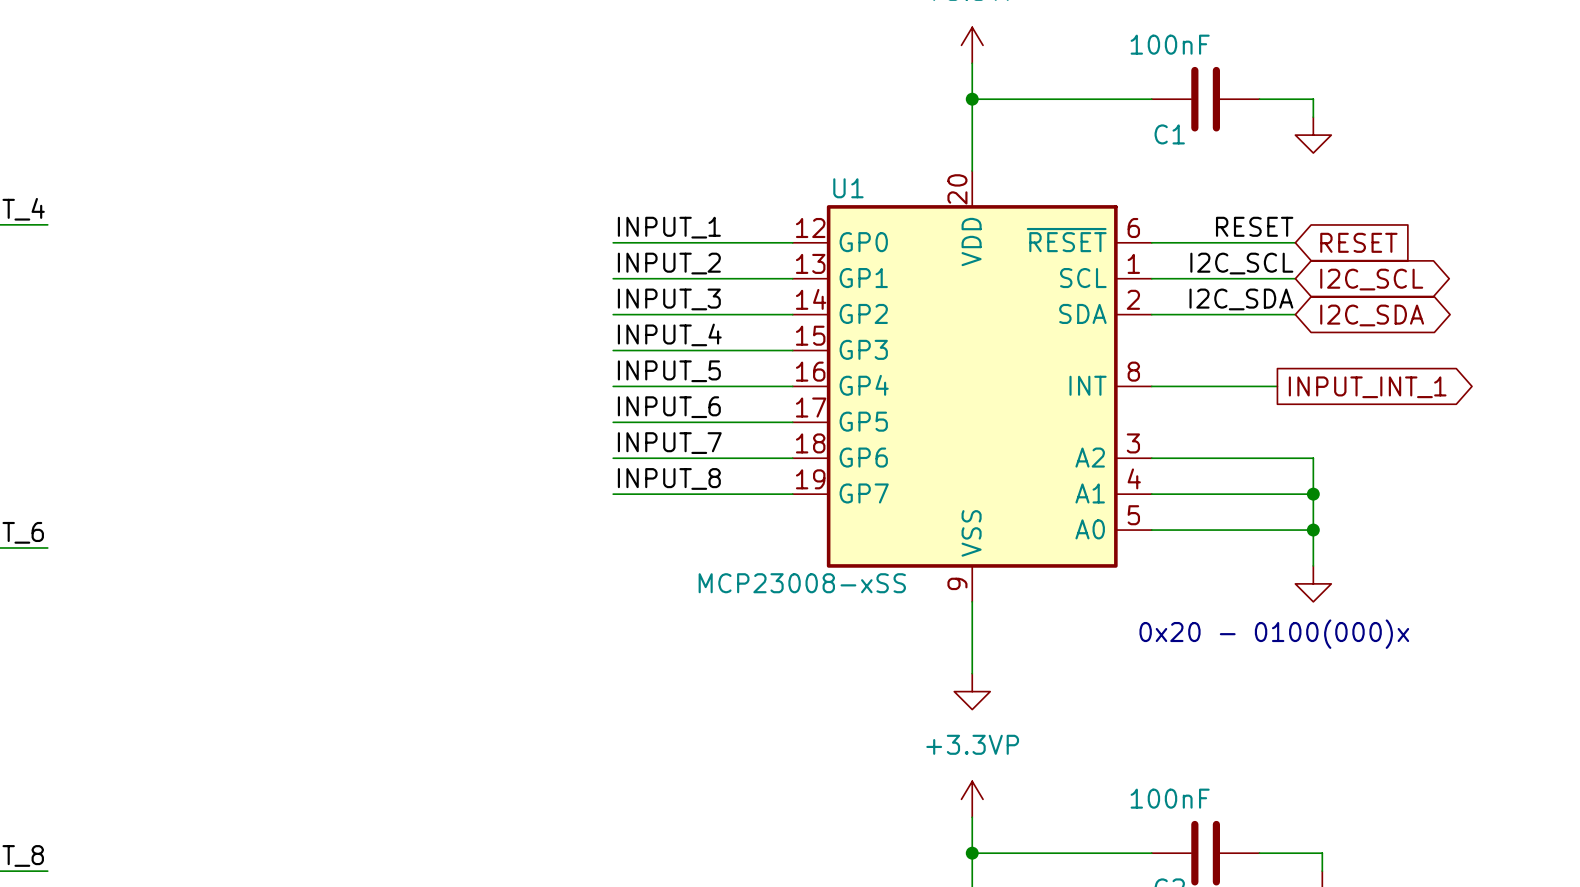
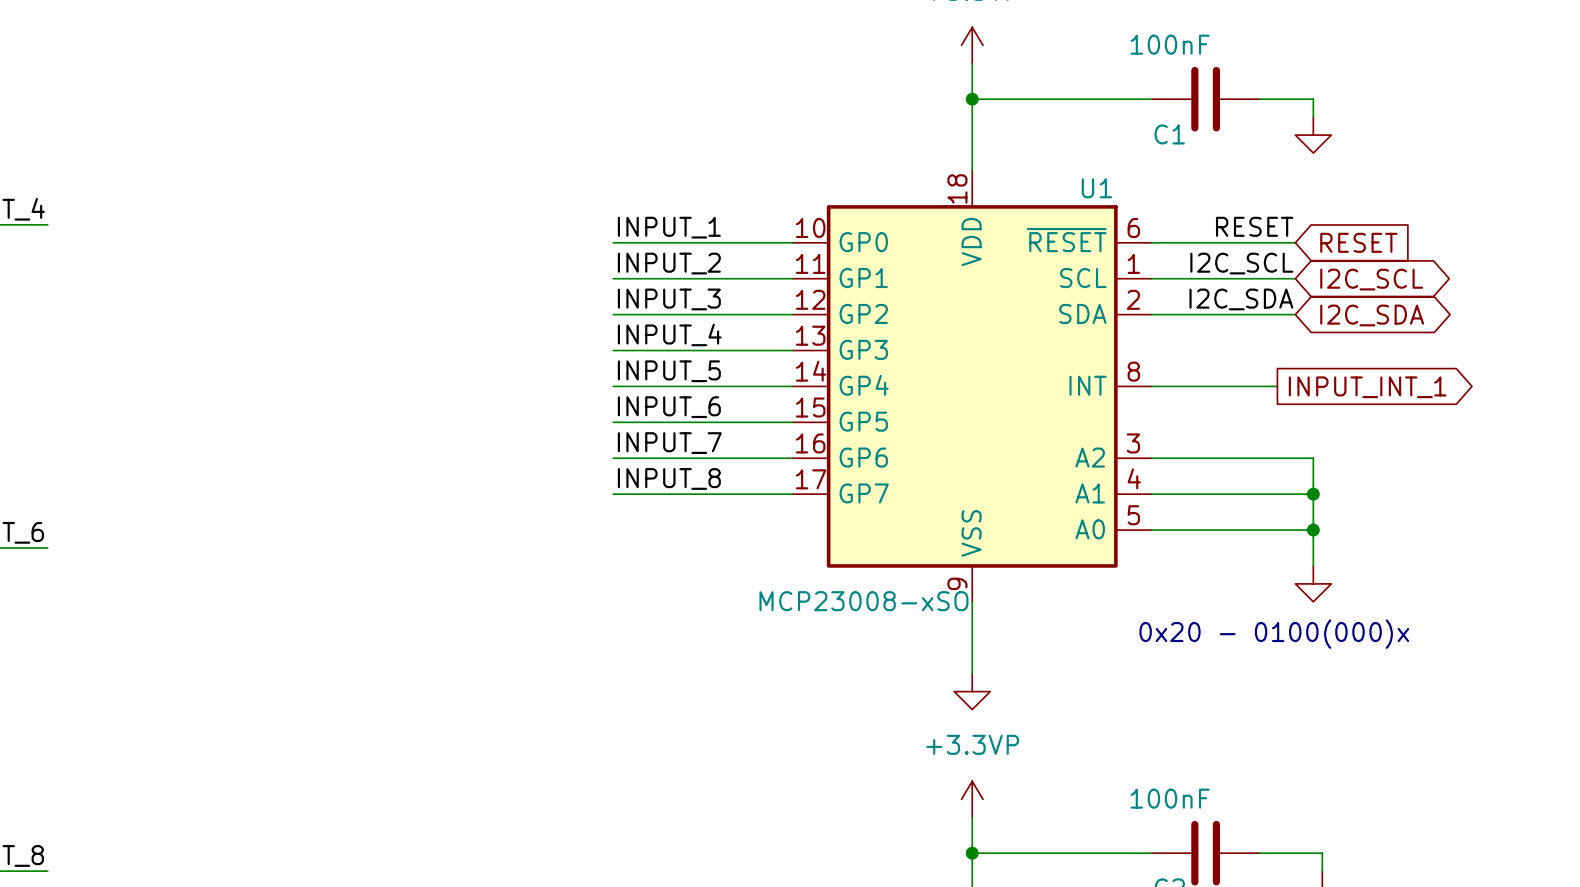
U1 symbol: [792, 171, 1152, 602] -> [792, 171, 1152, 602]
U1 name position: U1 (848, 188) -> U1 (1096, 188)
U1 value: MCP23008-xSS (802, 583) -> MCP23008-xSO (863, 601)

